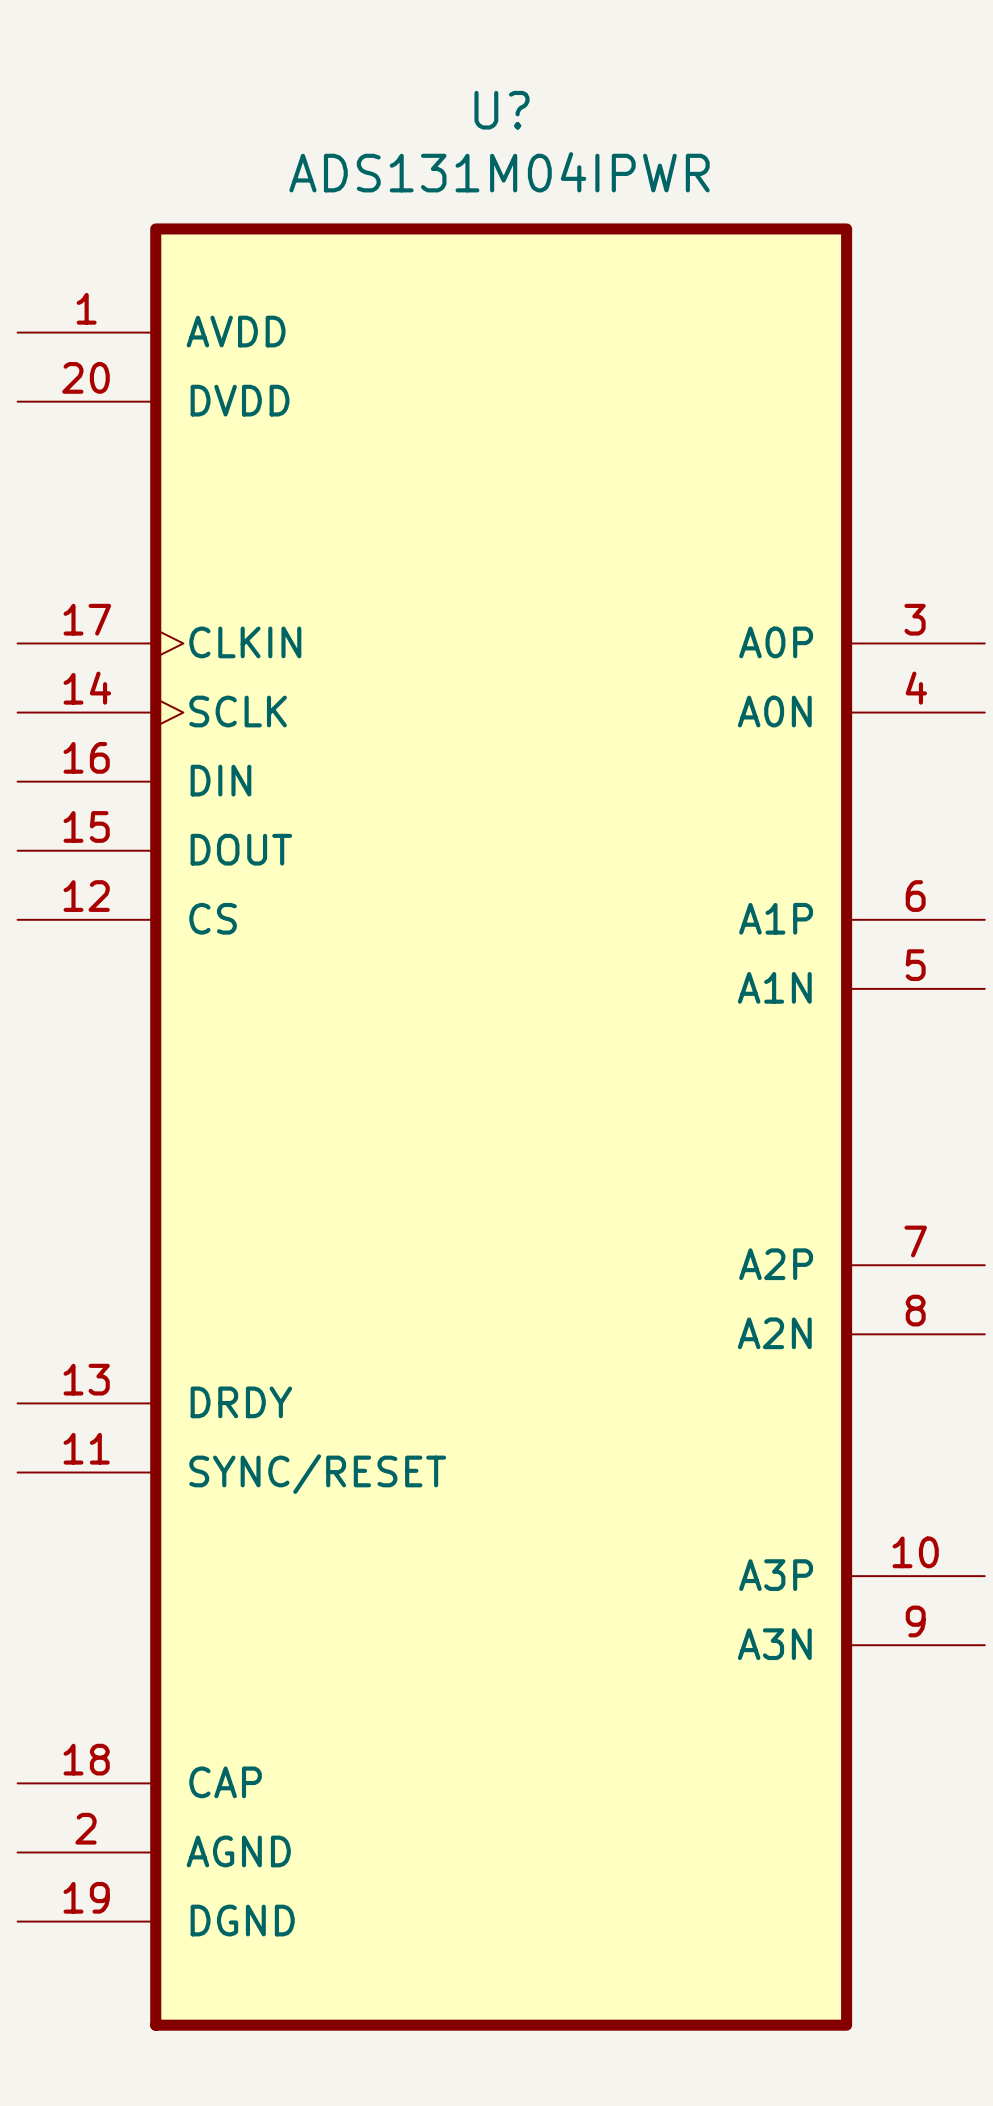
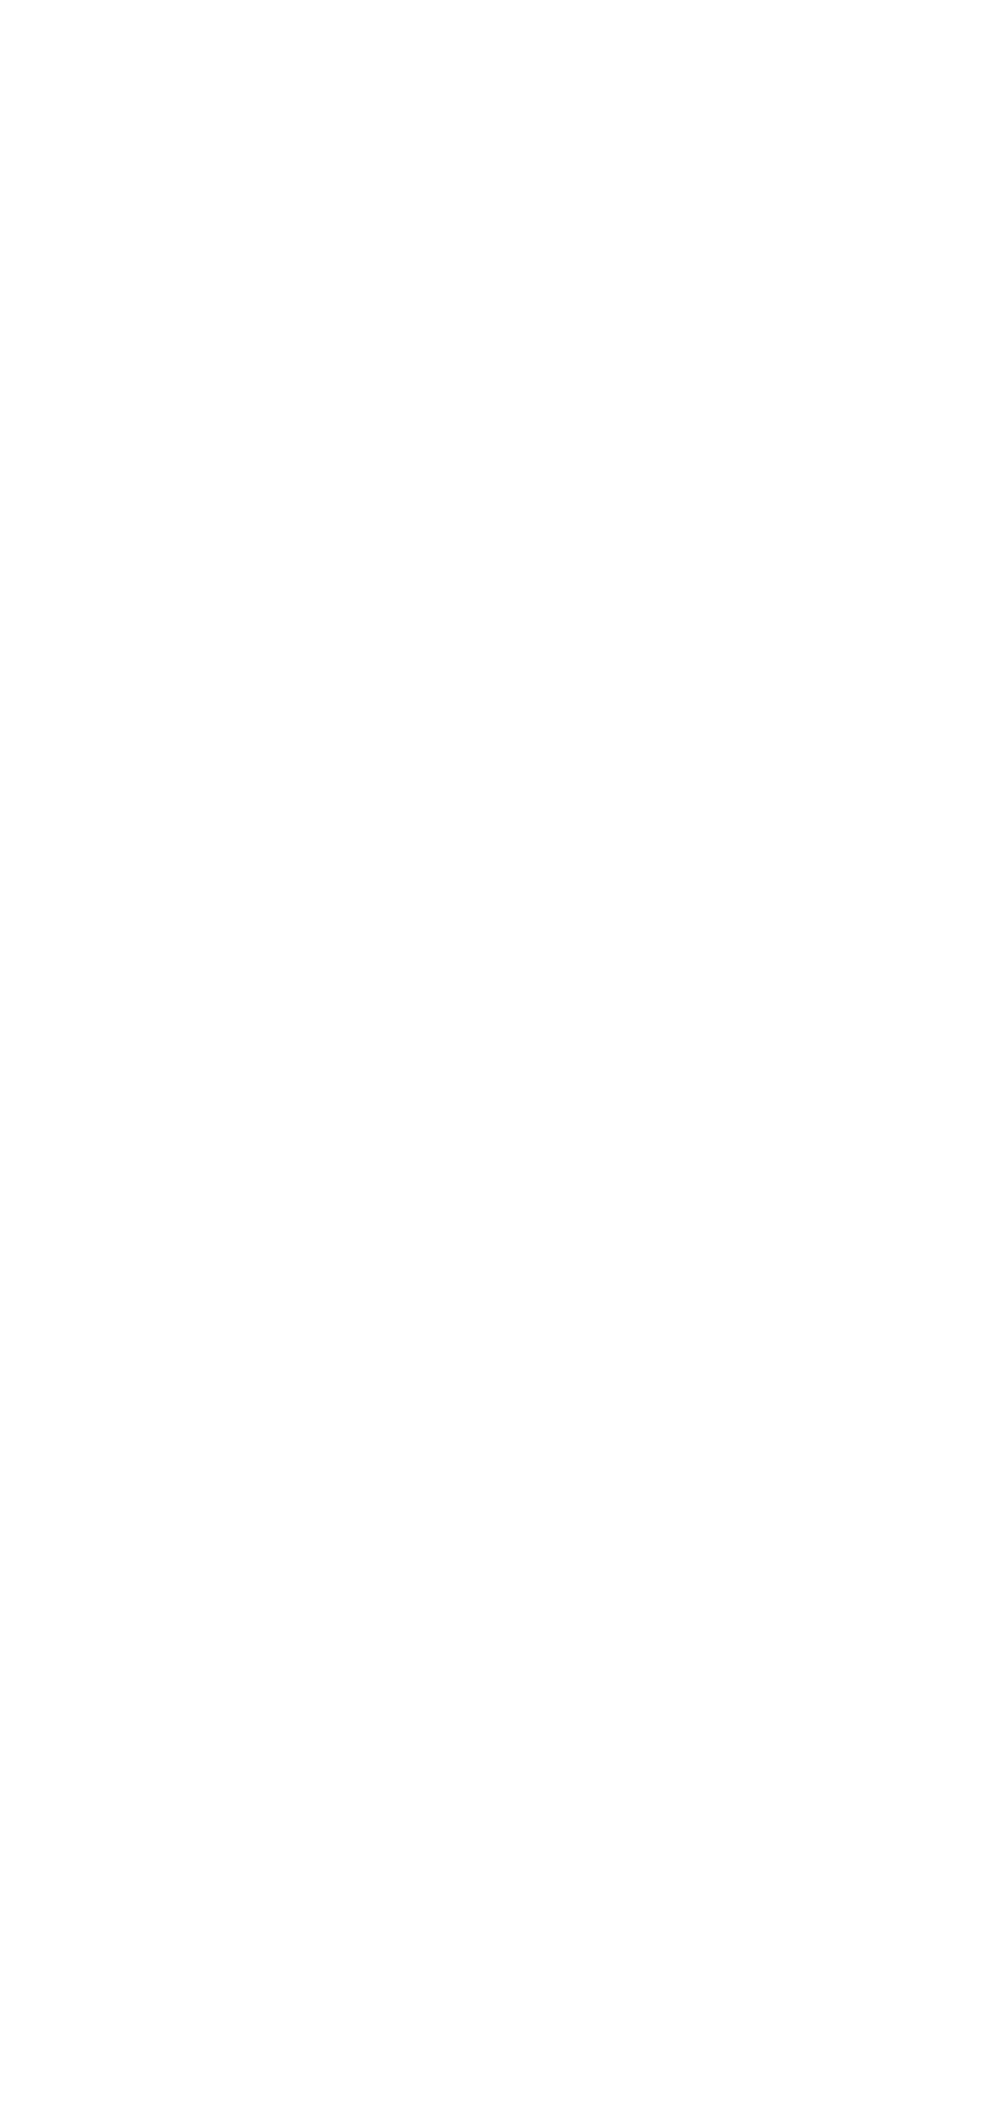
U?: ADS131M04IPWR (501, 1127) -> none

